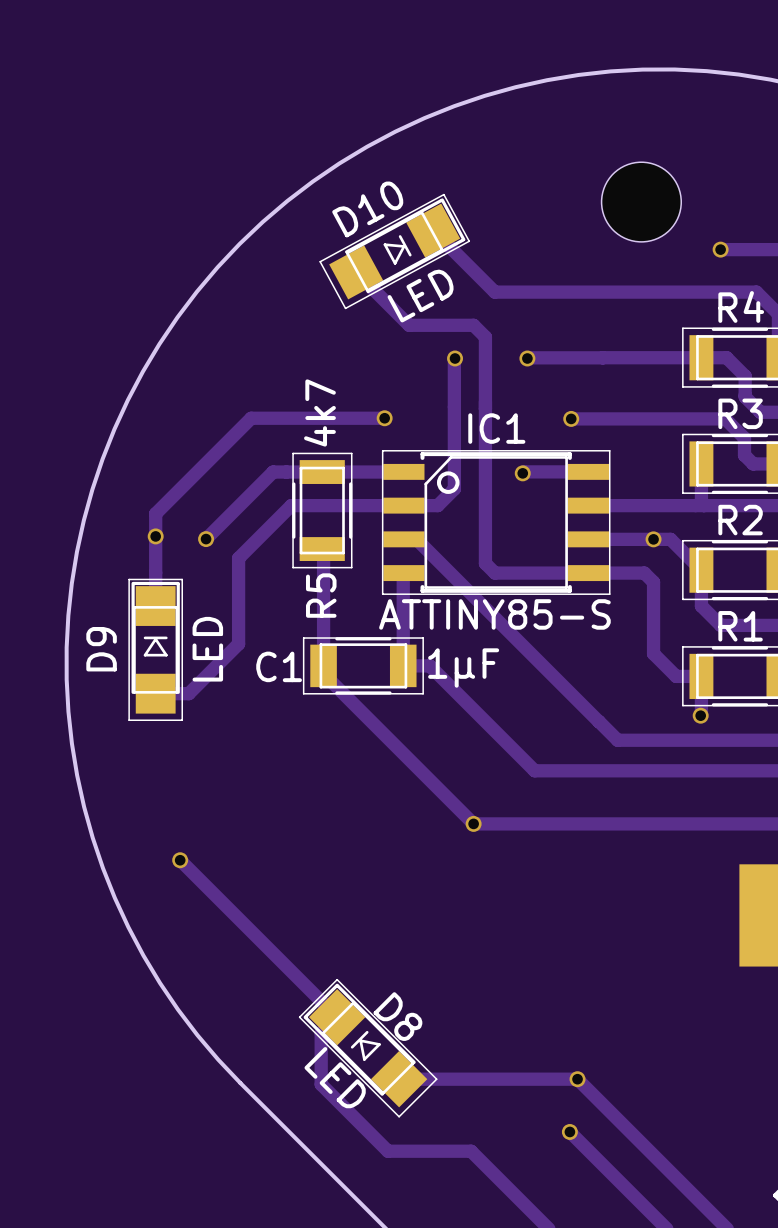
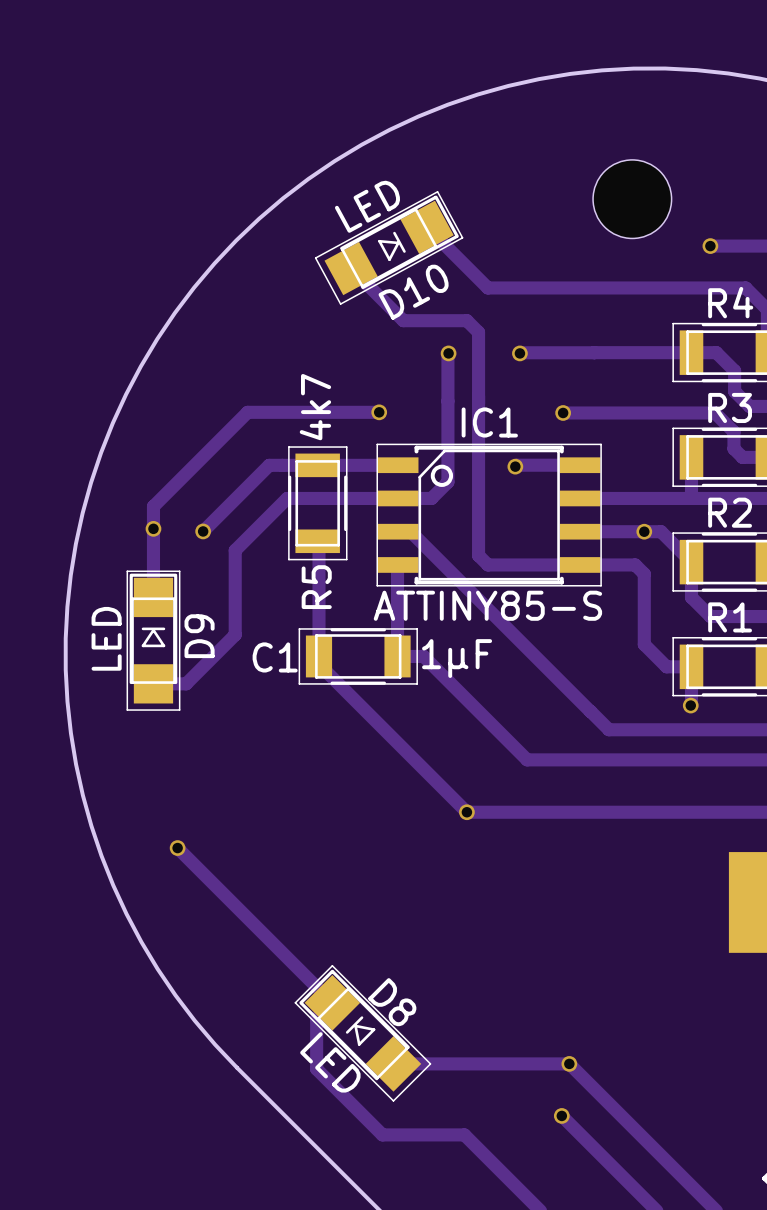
D10 name position: D10 (367, 209) -> D10 (413, 292)
D10 value position: LED (420, 296) -> LED (367, 206)
D9 name position: D9 (101, 649) -> D9 (199, 636)
D9 value position: LED (207, 649) -> LED (106, 638)

